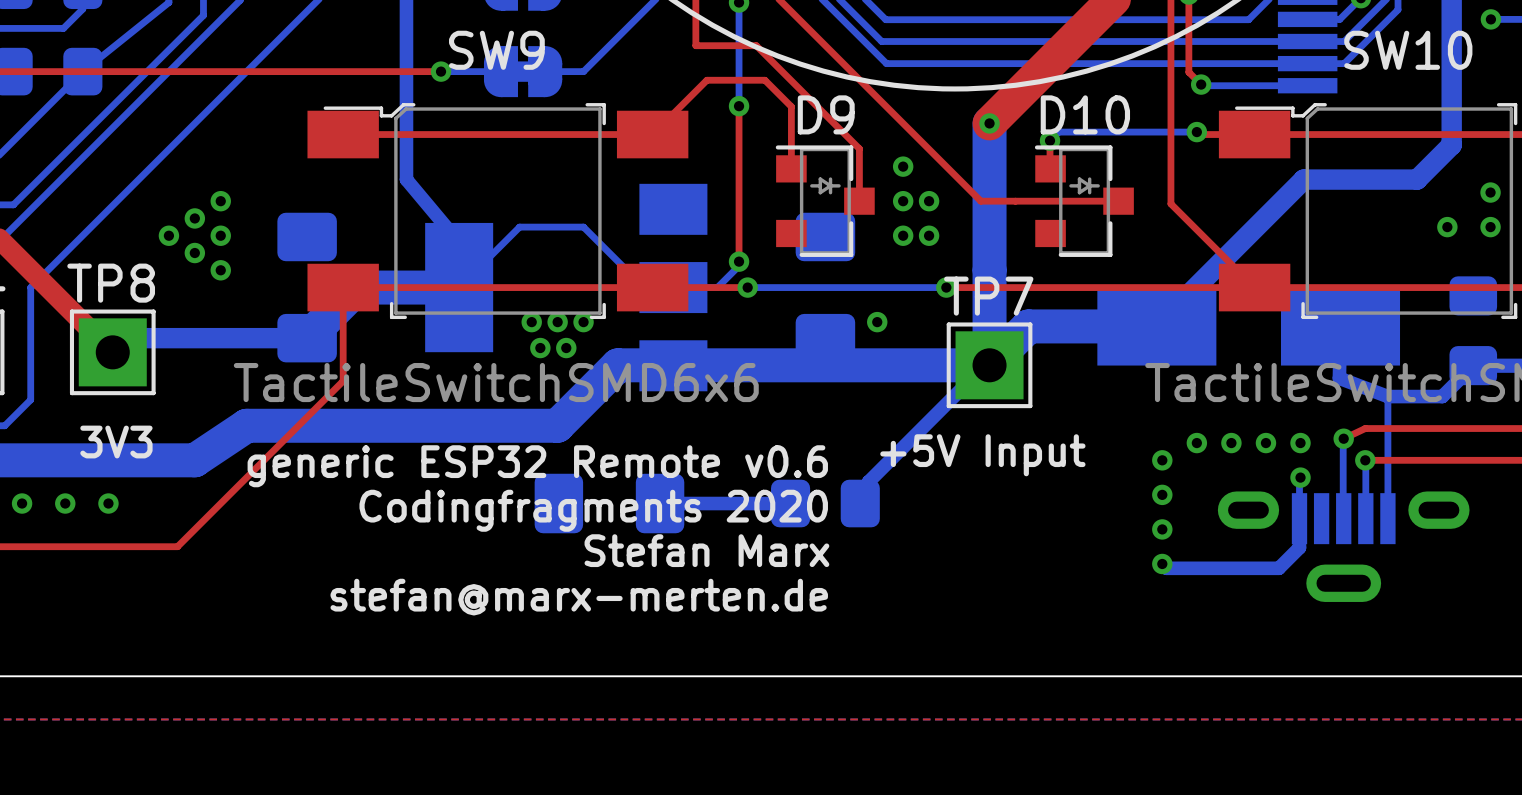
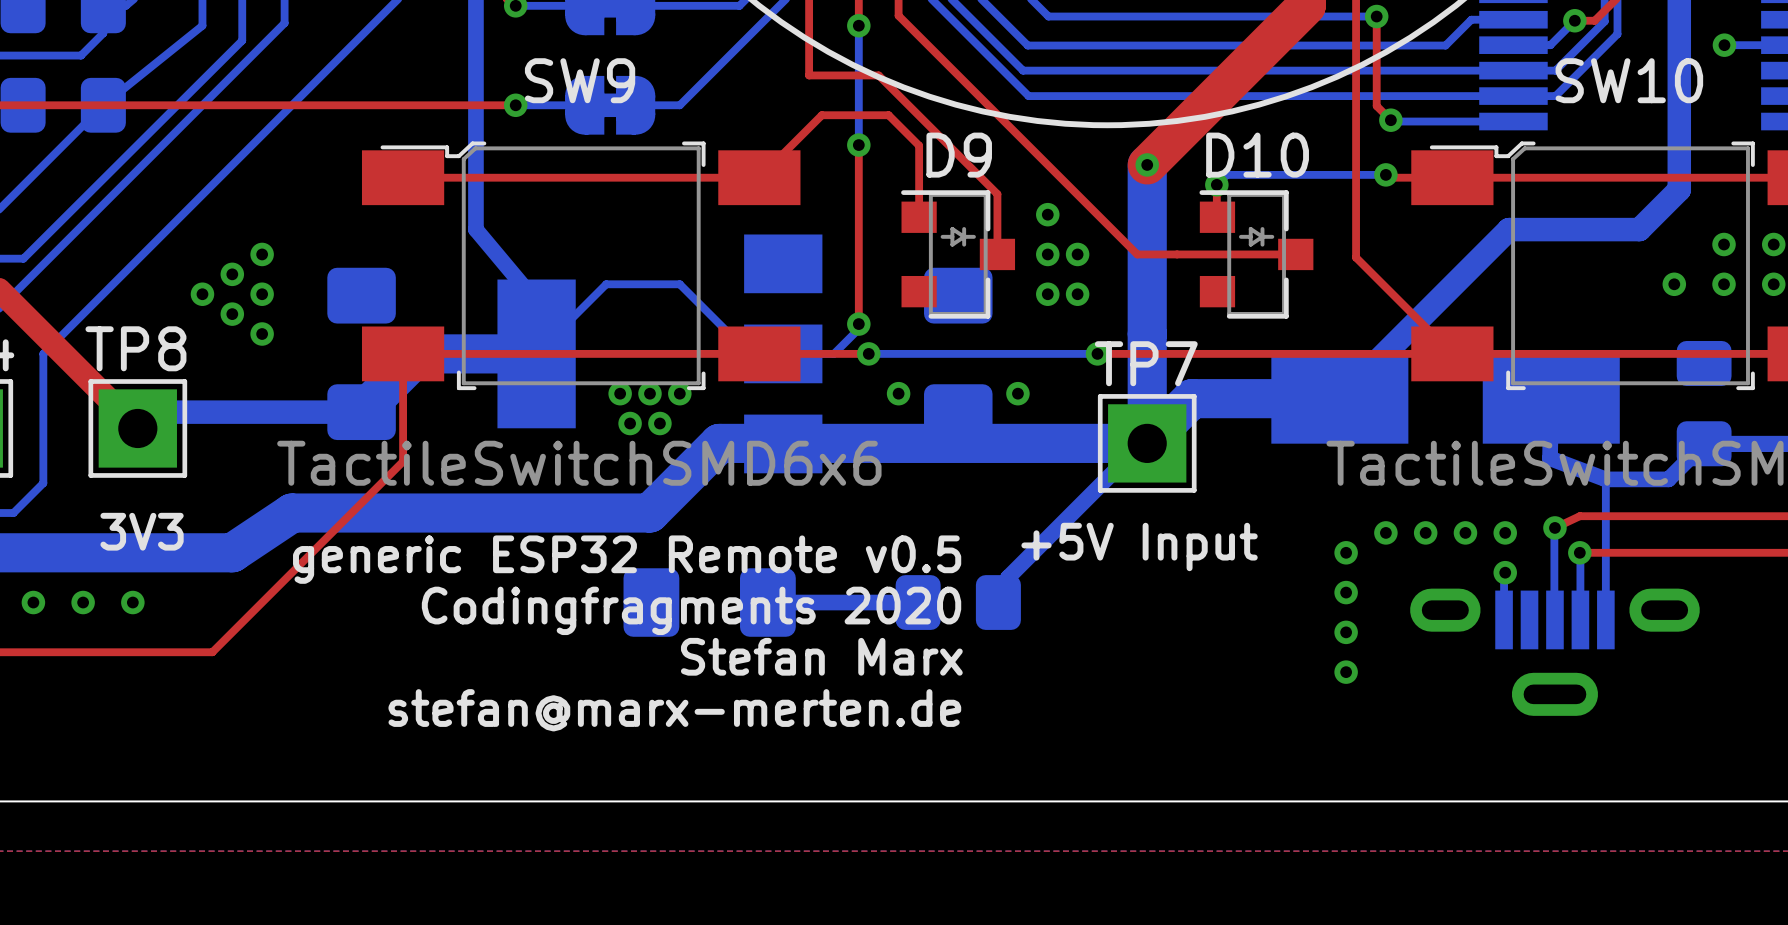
via: none -> (898, 393)
text: generic ESP32 Remote v0.6 (537, 466) -> generic ESP32 Remote v0.5 (627, 559)
bottom track: (1299, 518) (1299, 547) (1278, 568) (1166, 568) (1162, 563) -> none

